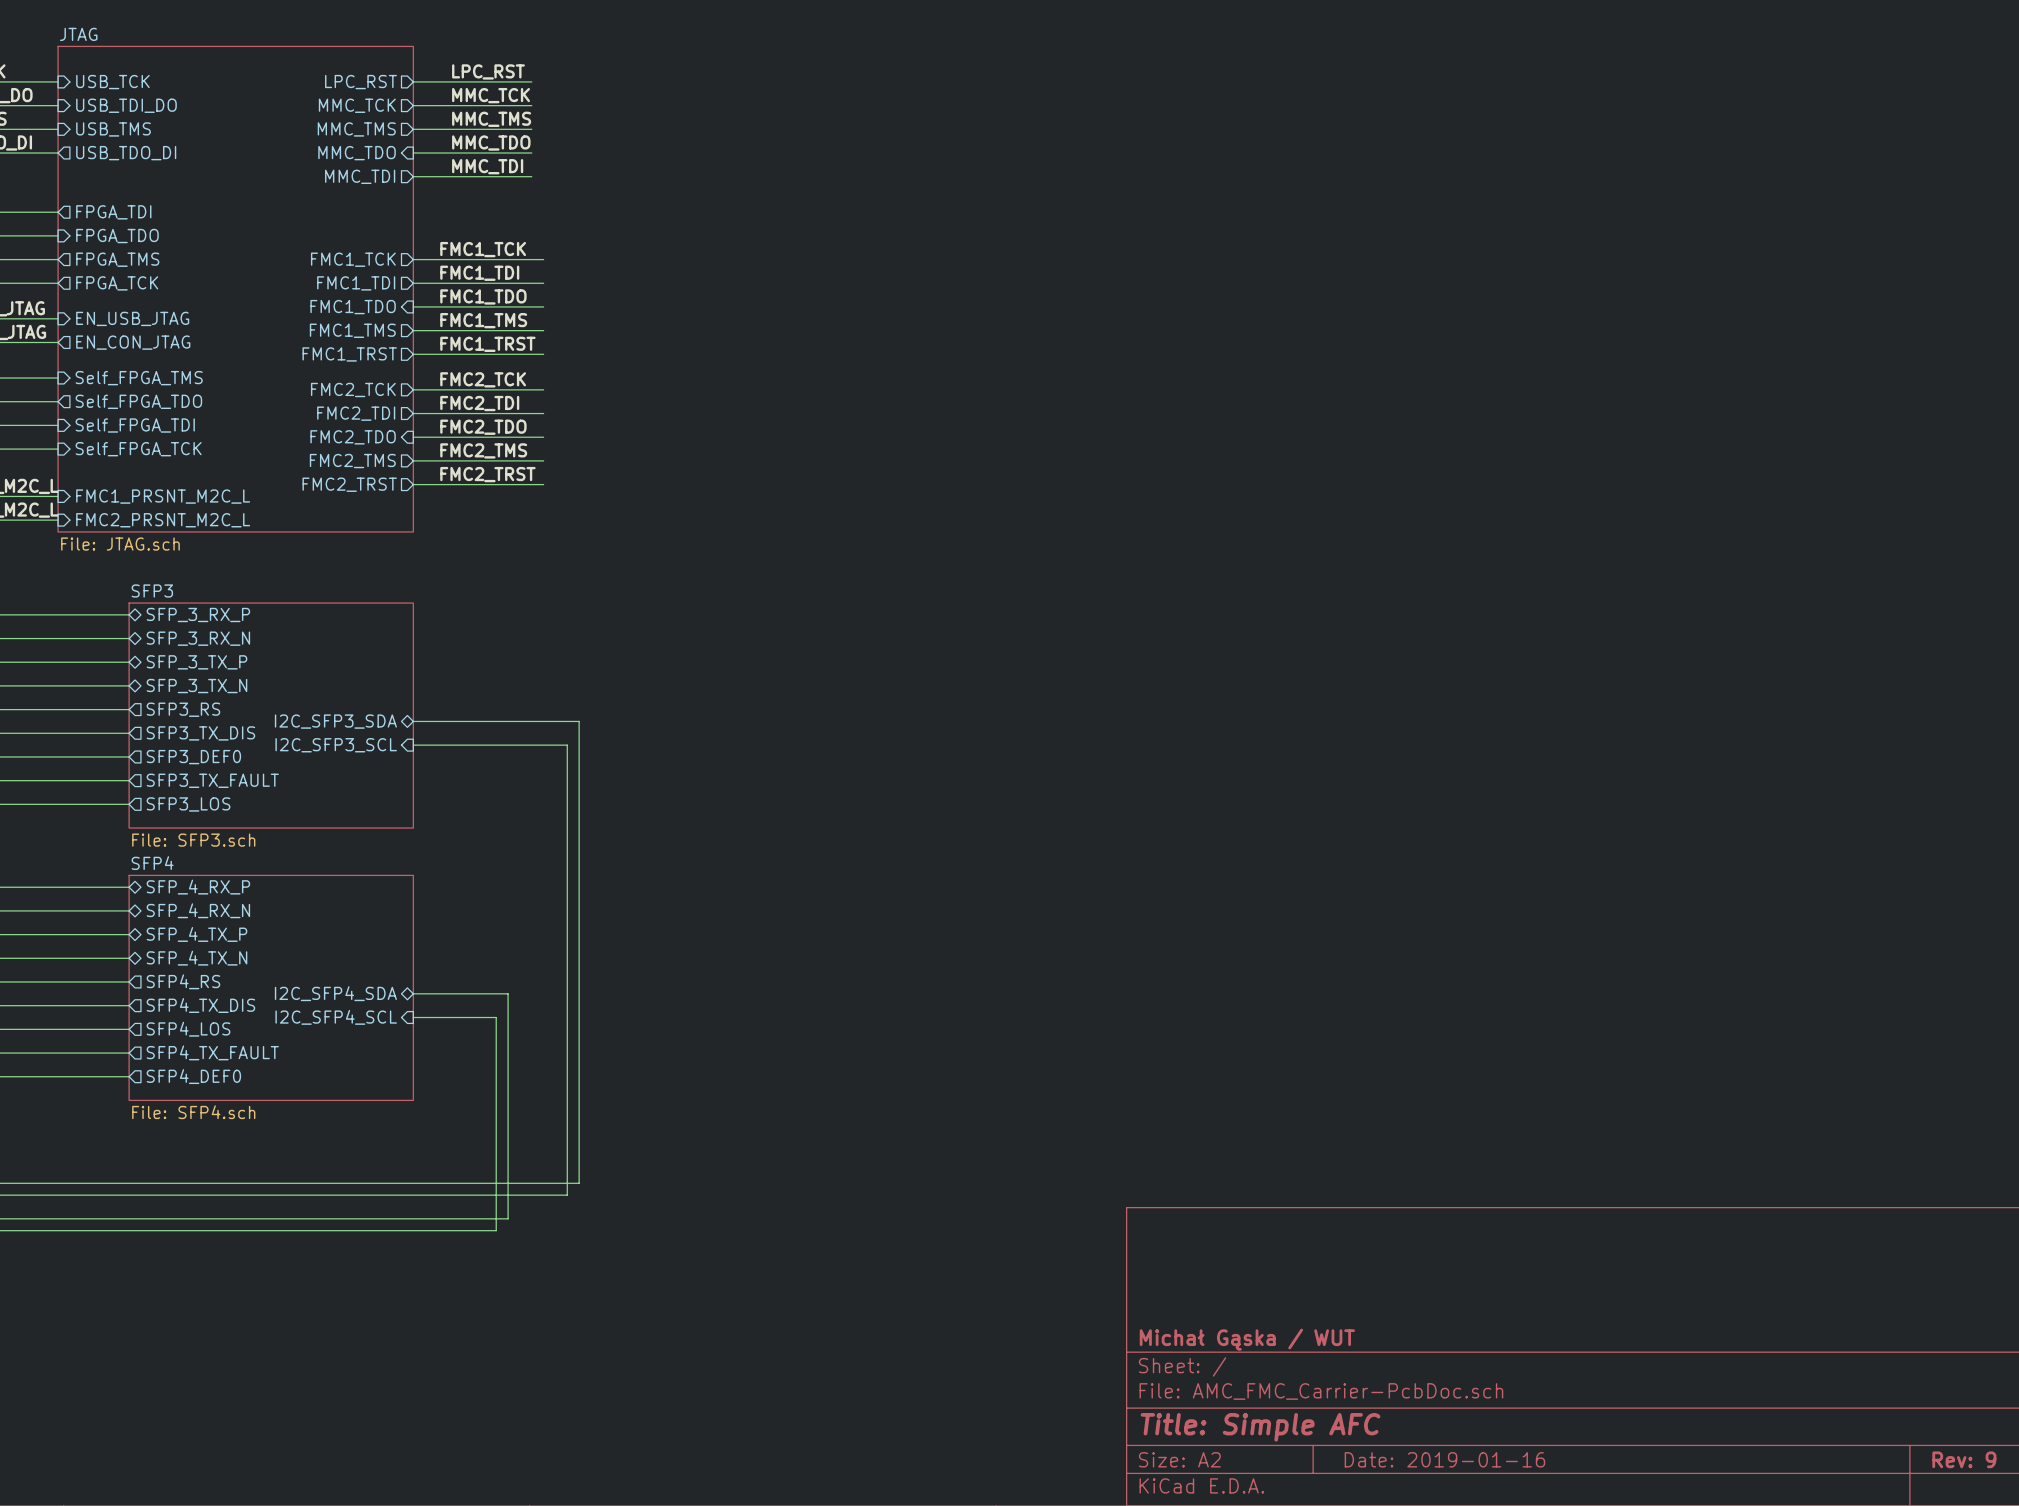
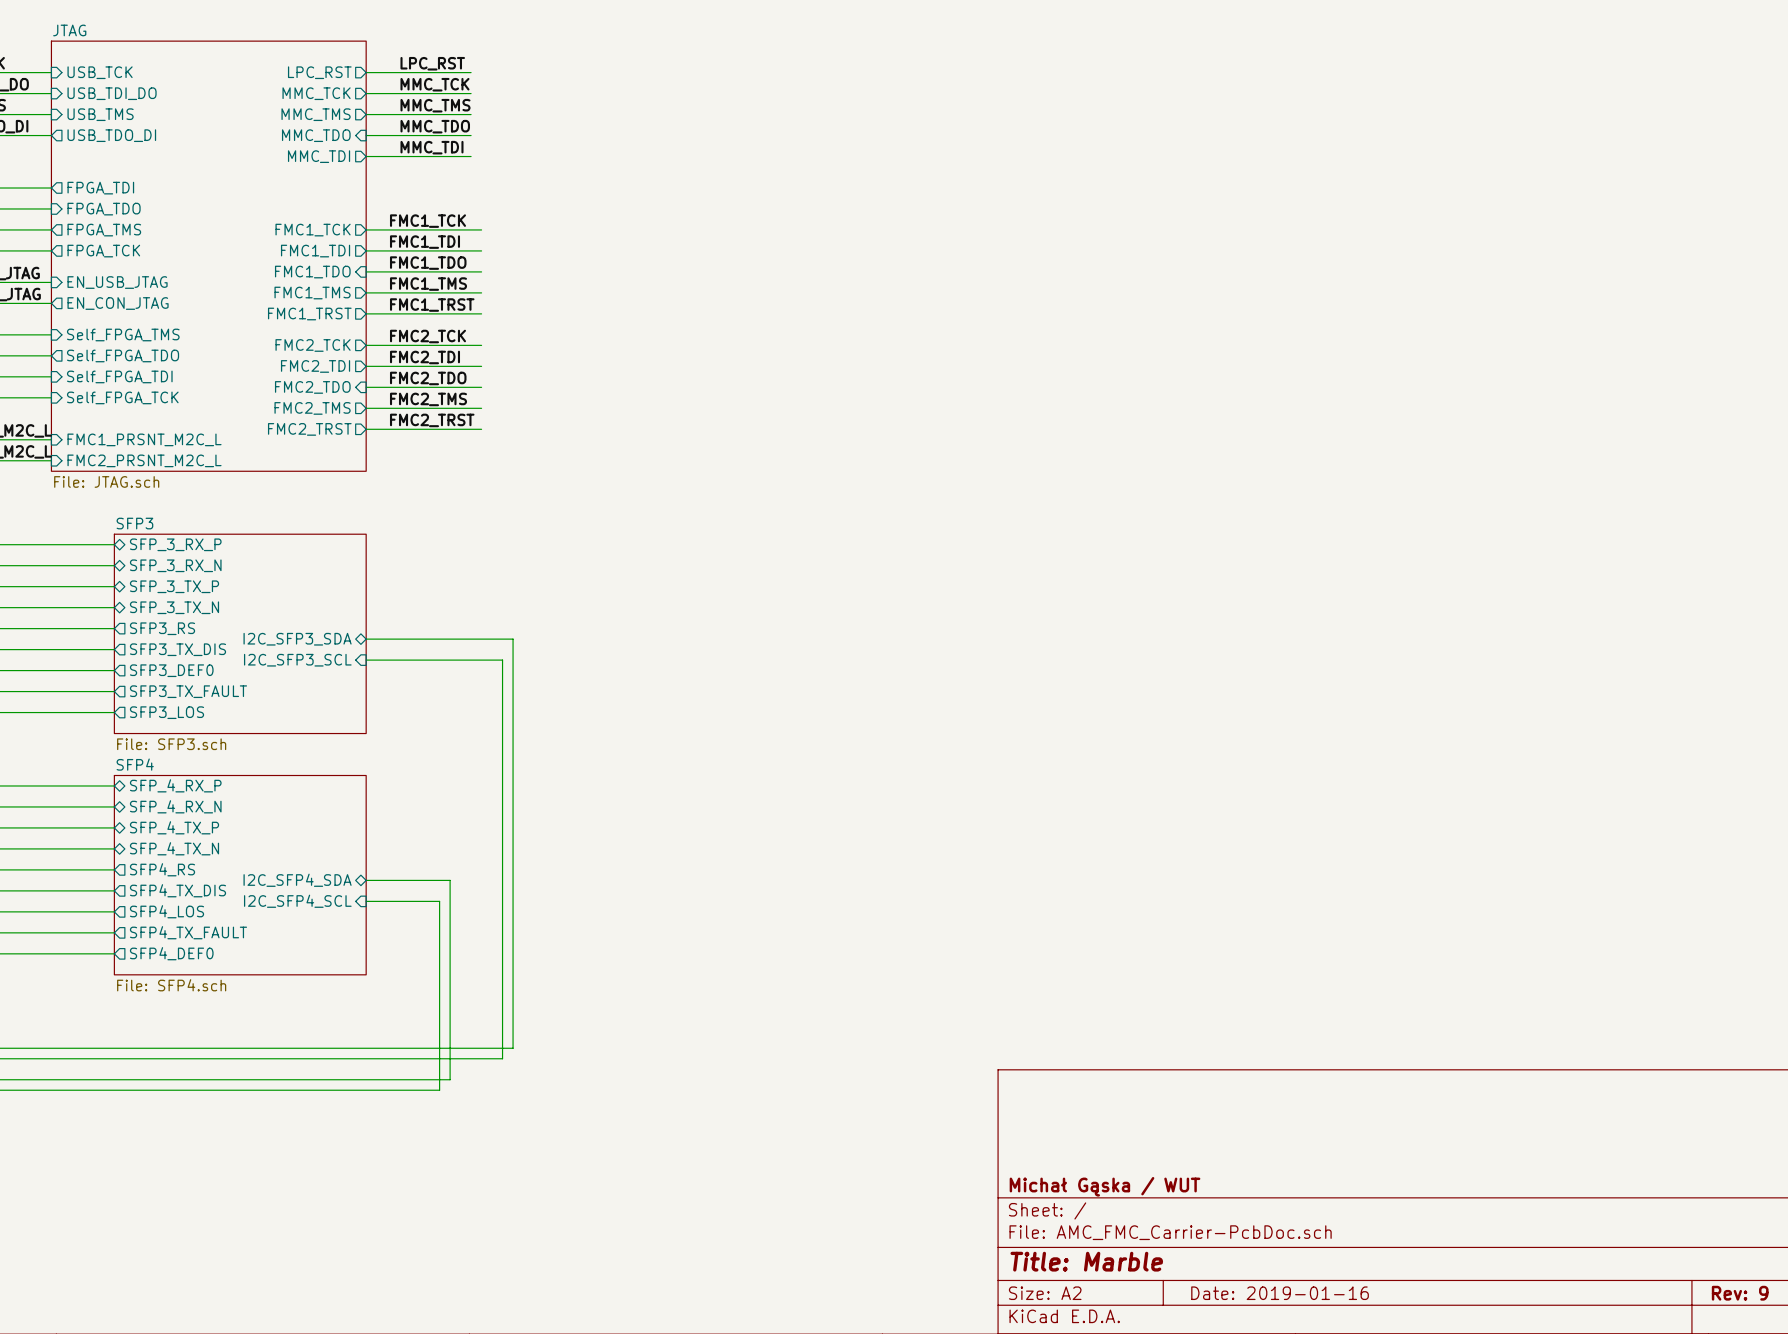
title block: Title: Simple AFC (1260, 1427) -> Title: Marble (1086, 1261)

